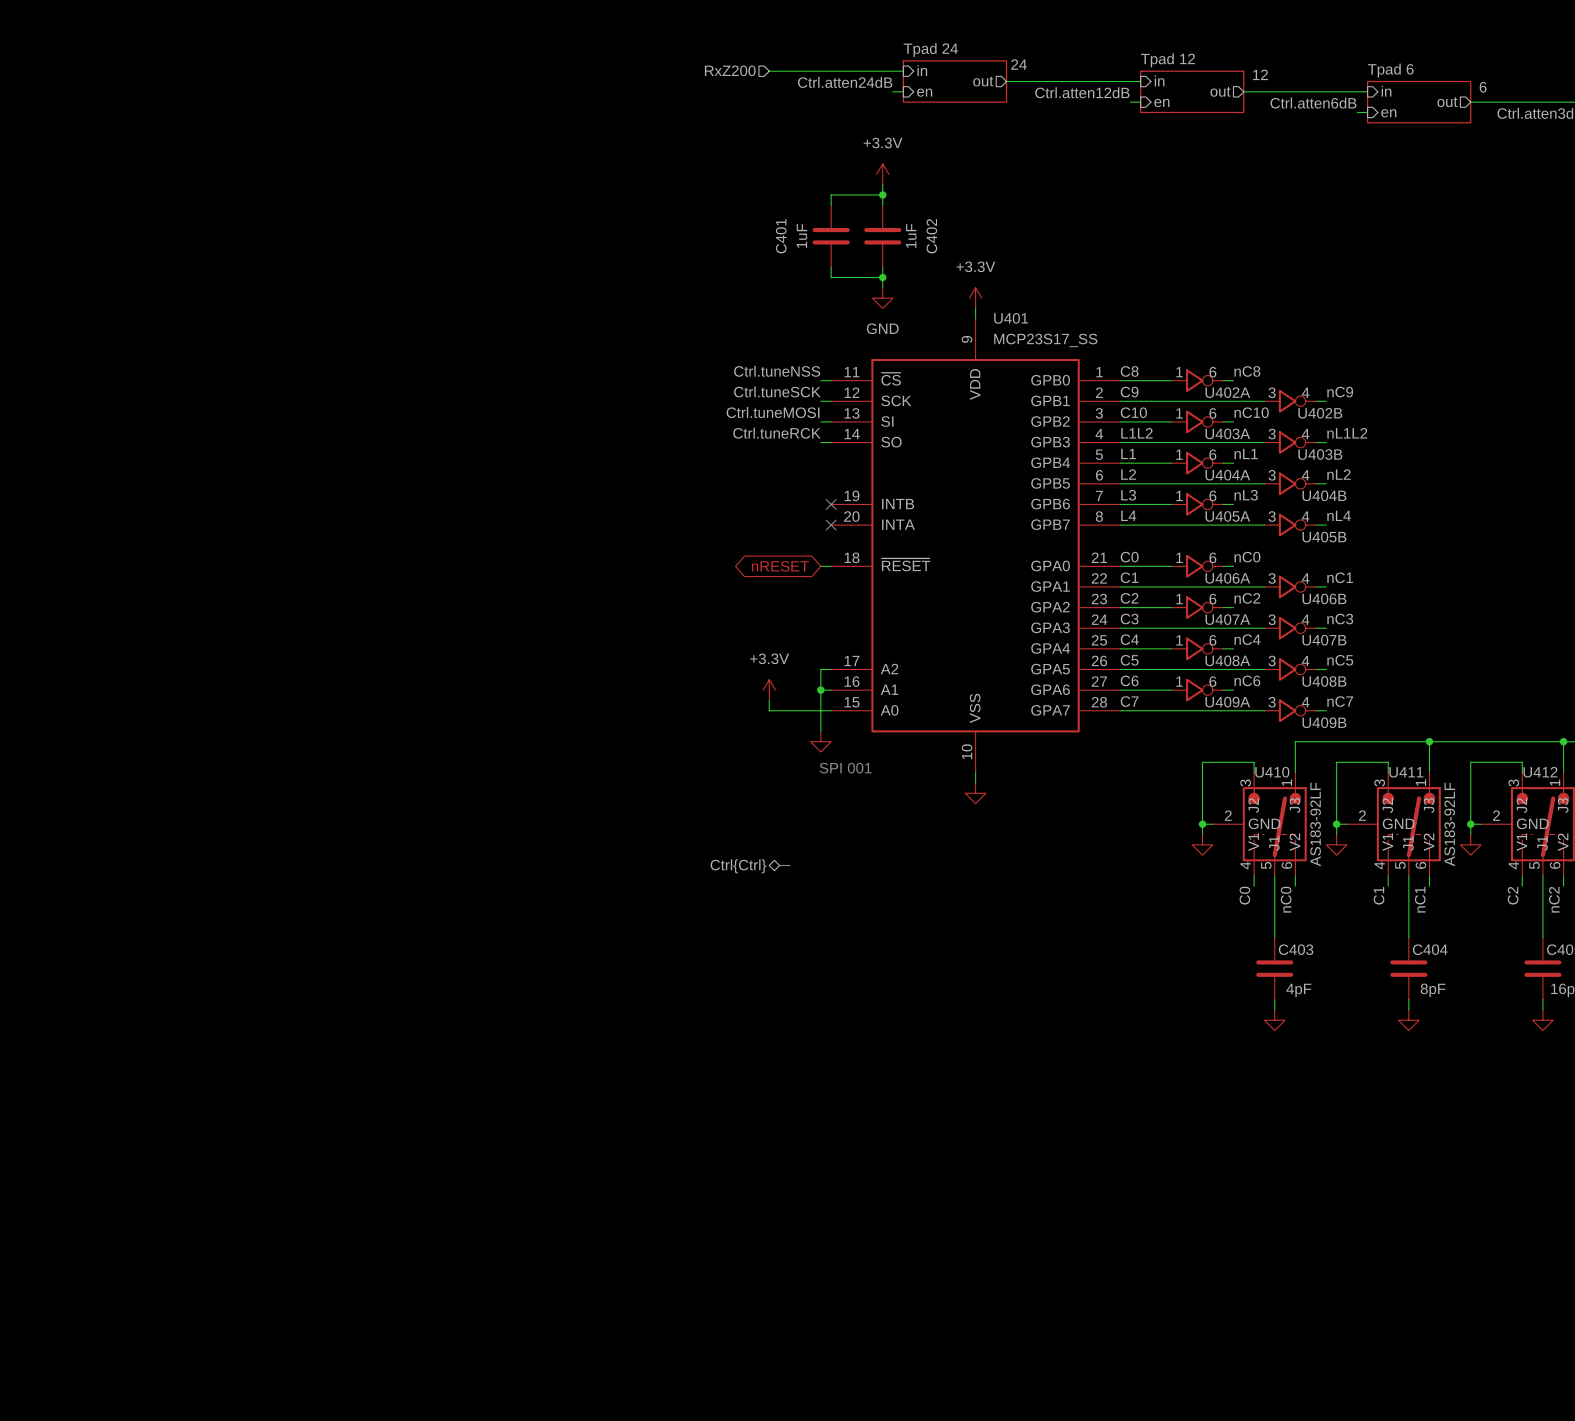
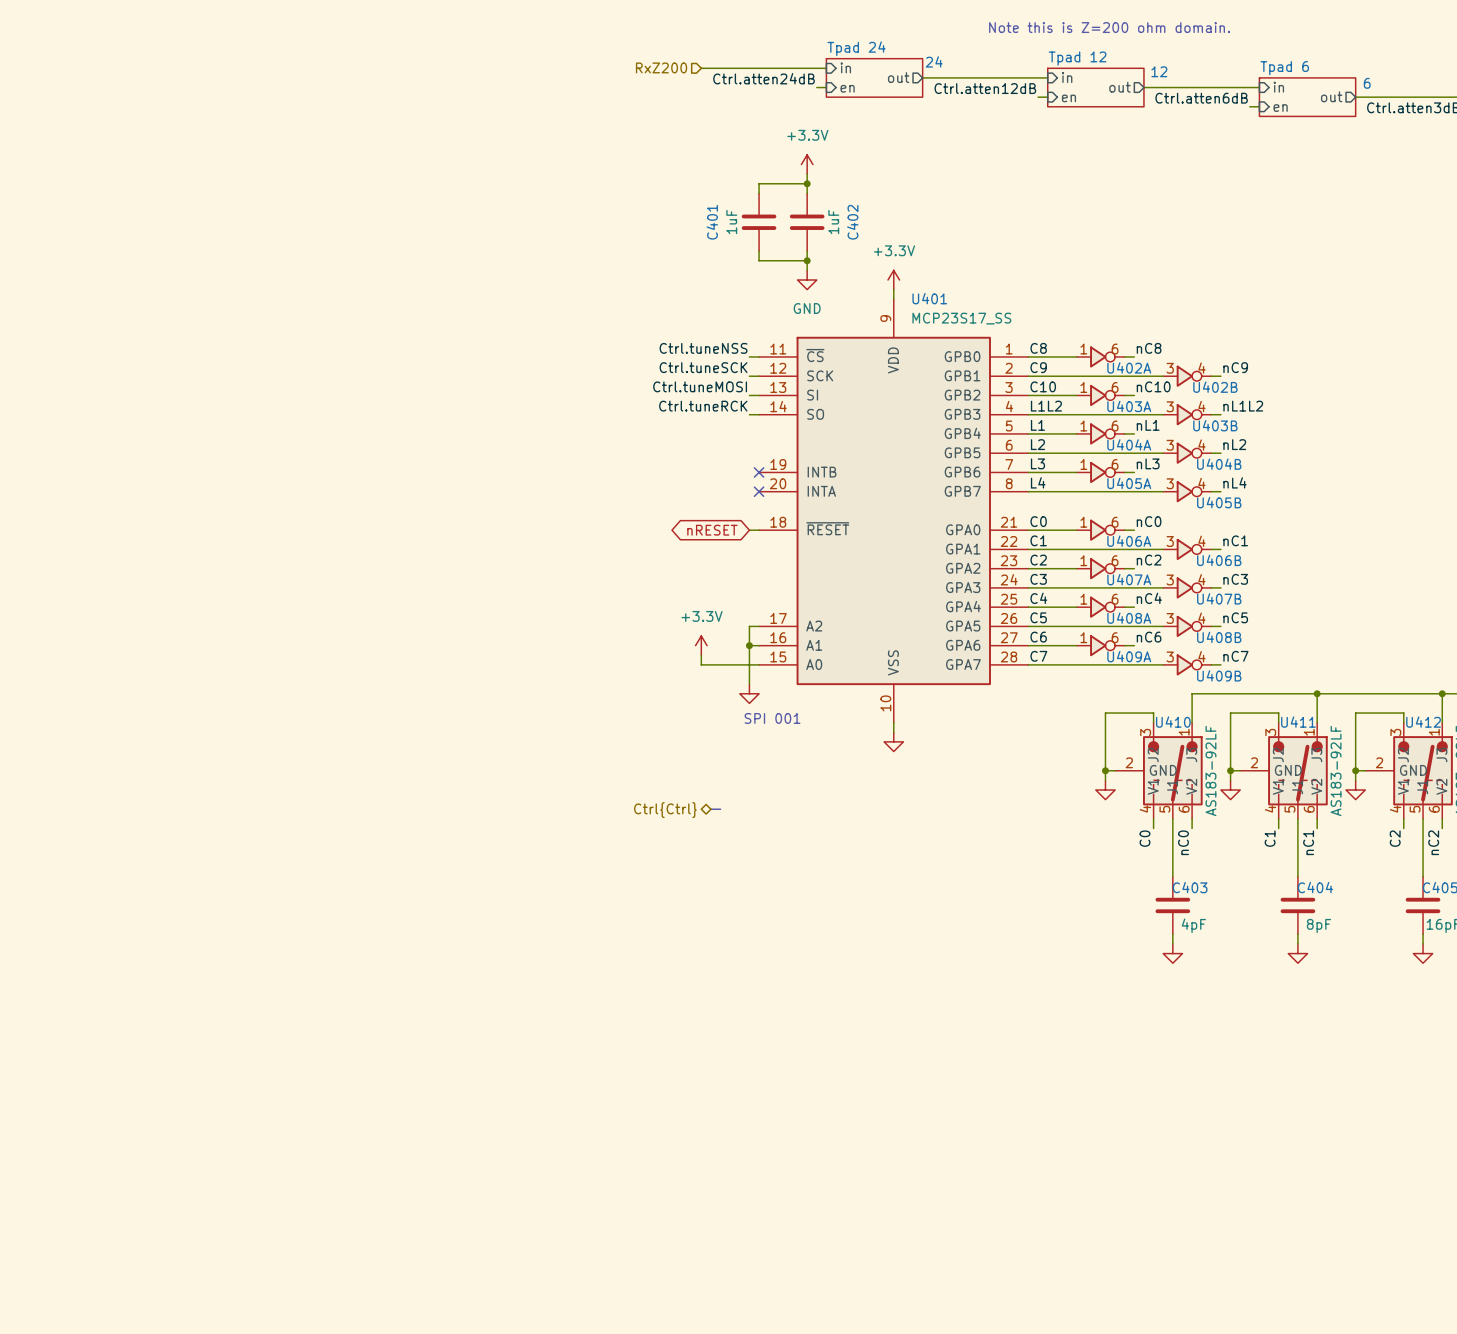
text: none -> Note this is Z=200 ohm domain. (1109, 27)

